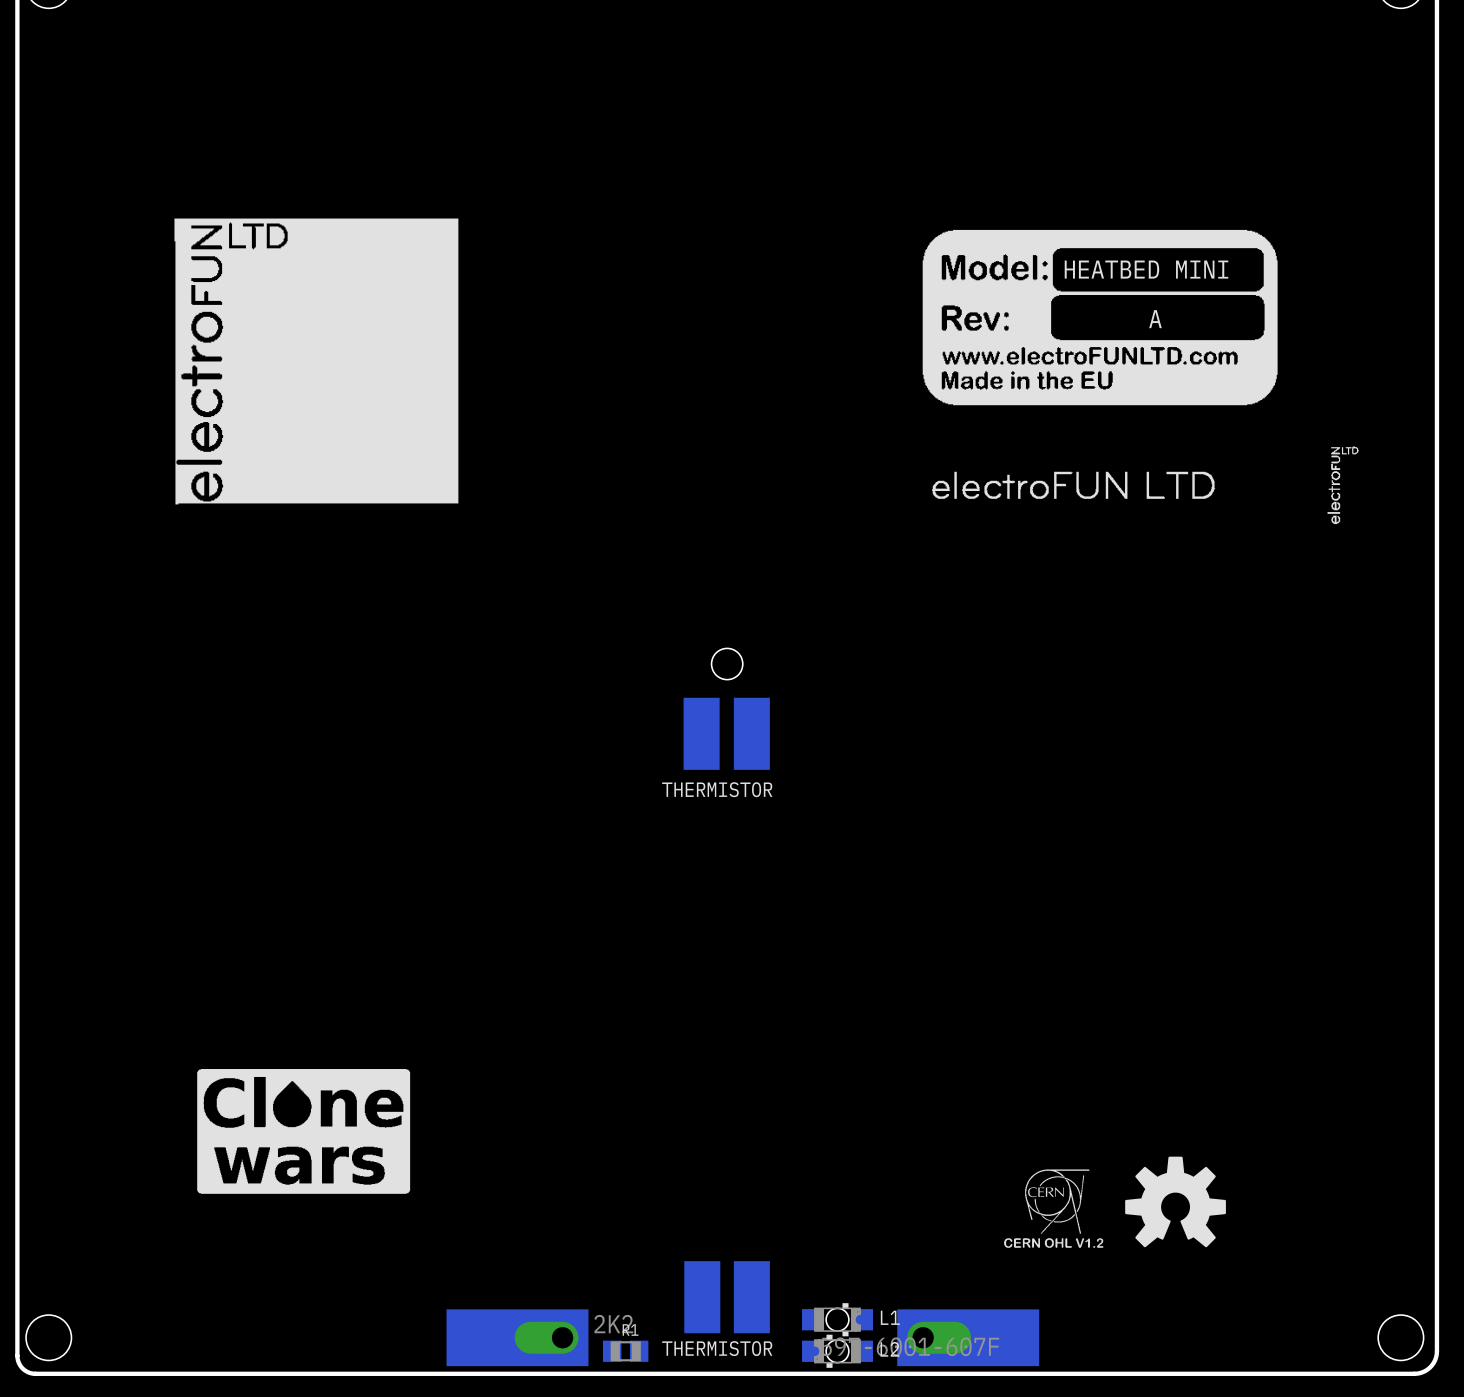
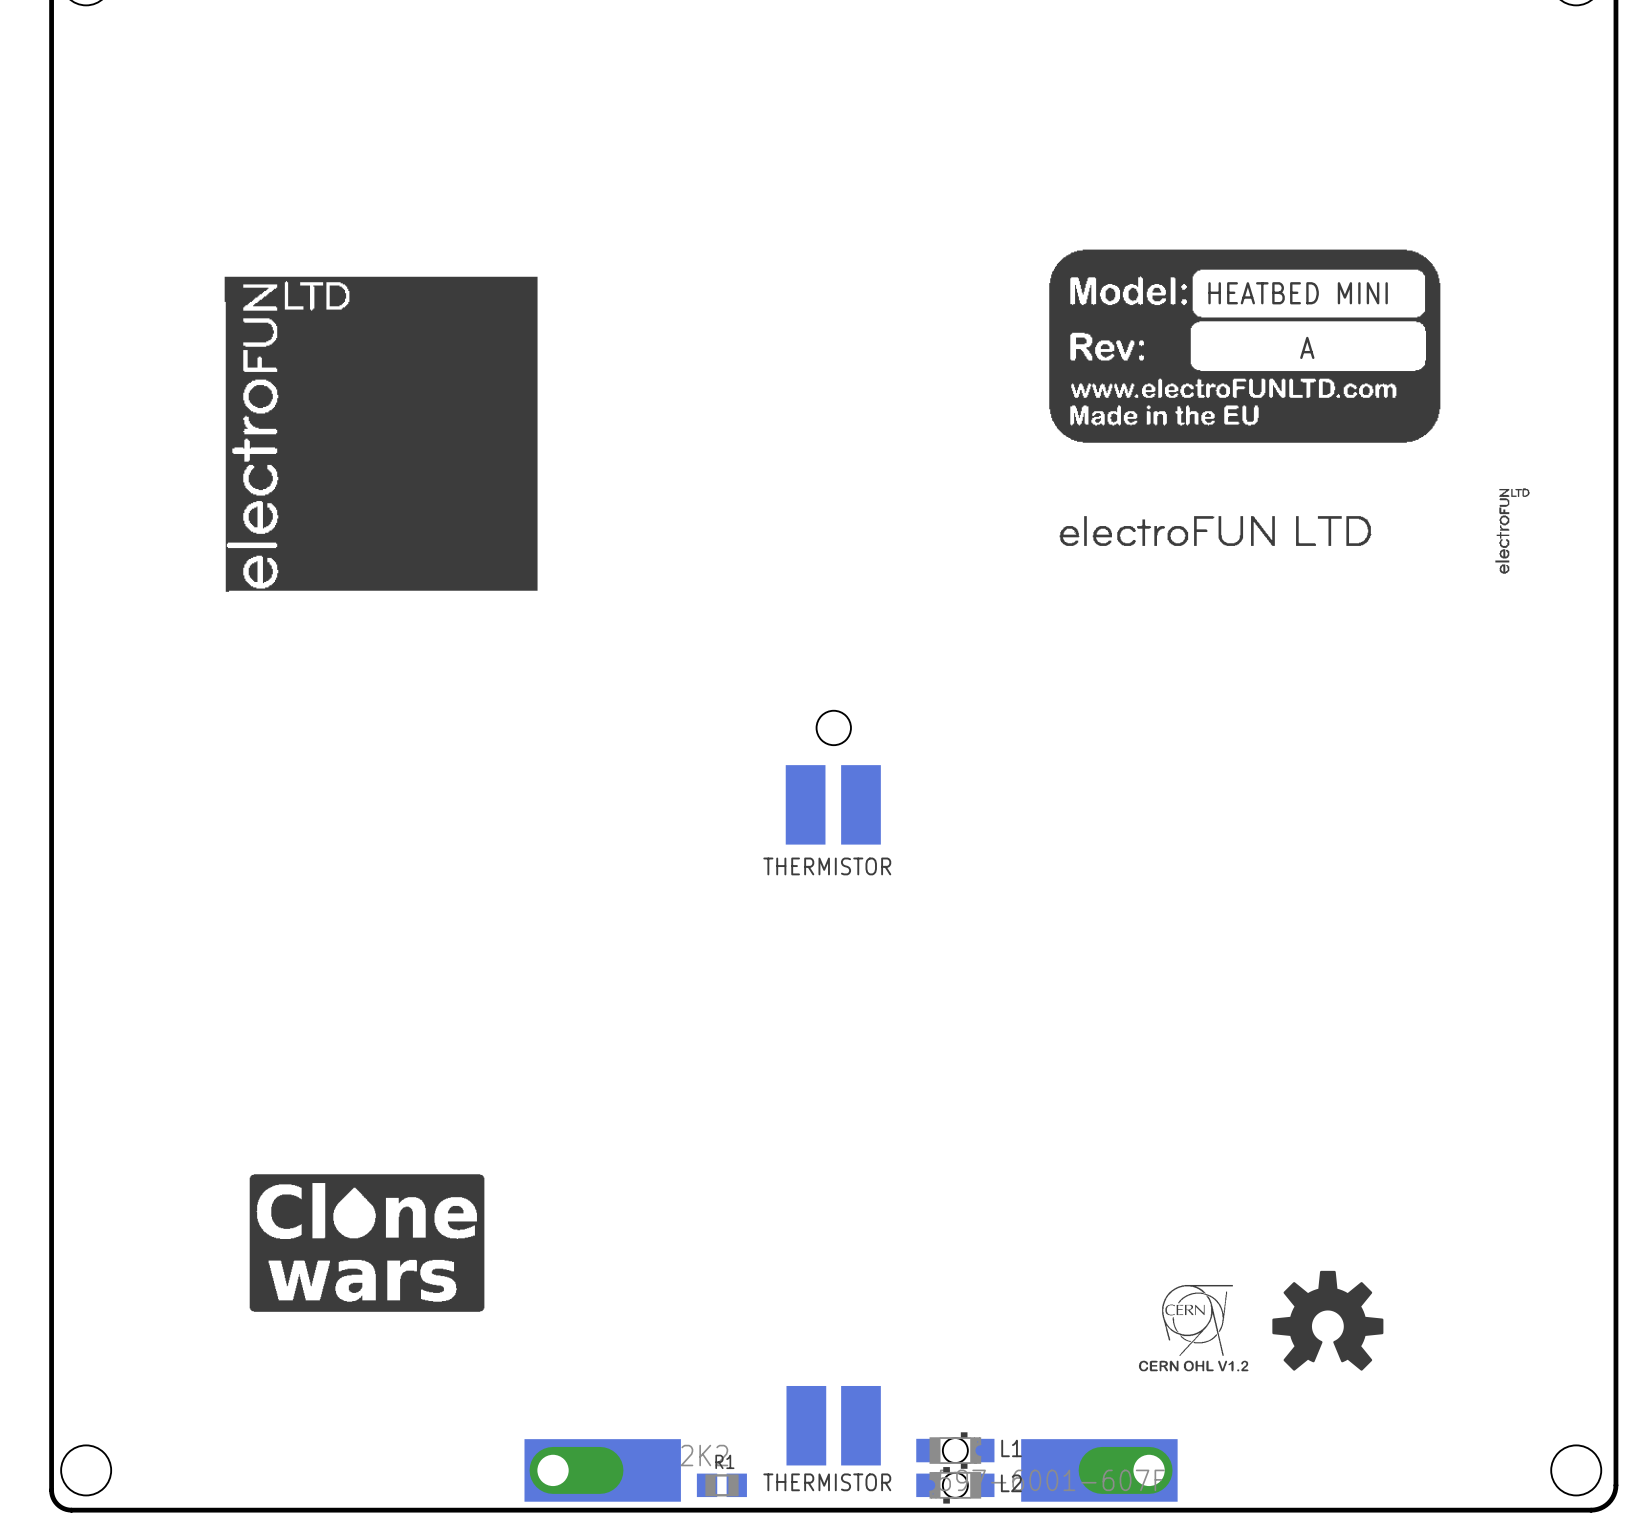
drawing position: (316, 361) -> (381, 434)
part footprint: [446, 1309, 589, 1367] -> [524, 1439, 681, 1502]
part footprint: [897, 1309, 1040, 1367] -> [1021, 1439, 1178, 1502]

